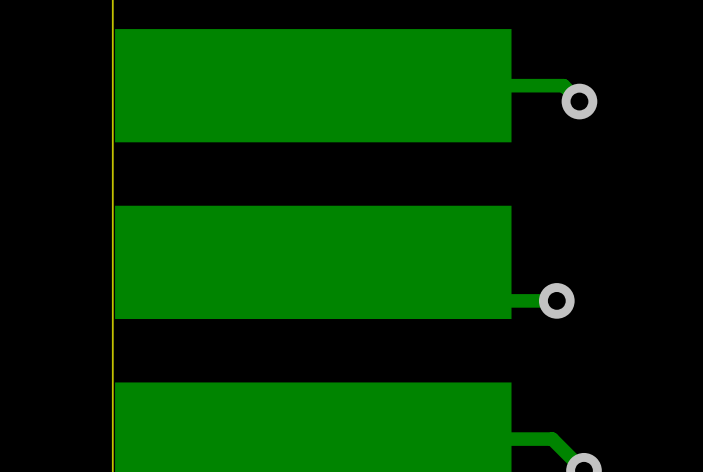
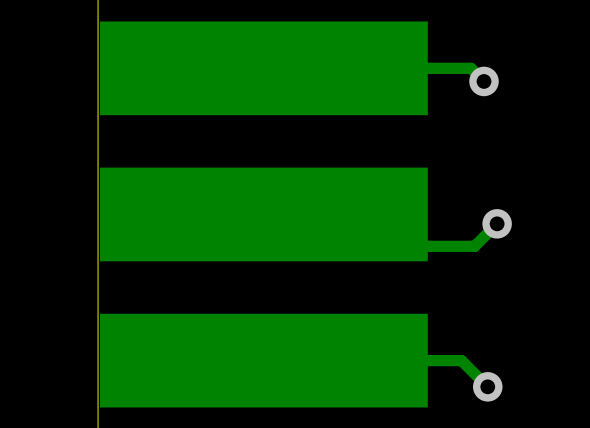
track: none -> (497, 223) (474, 246) (465, 246)
via position: (556, 300) -> (497, 223)

